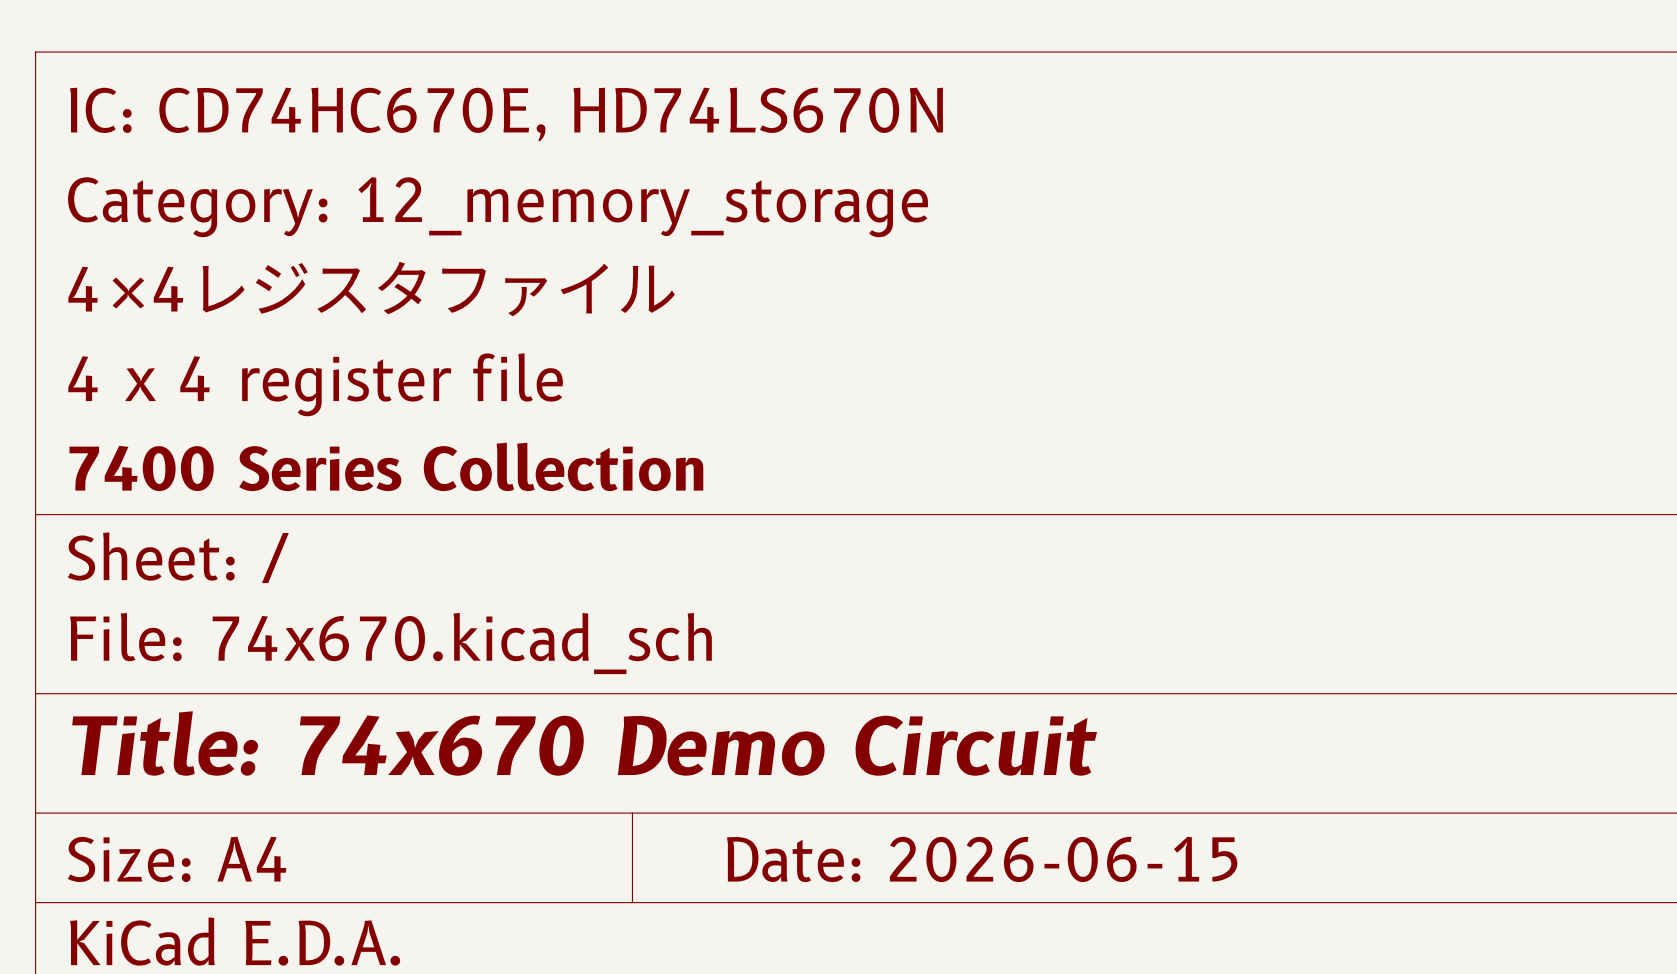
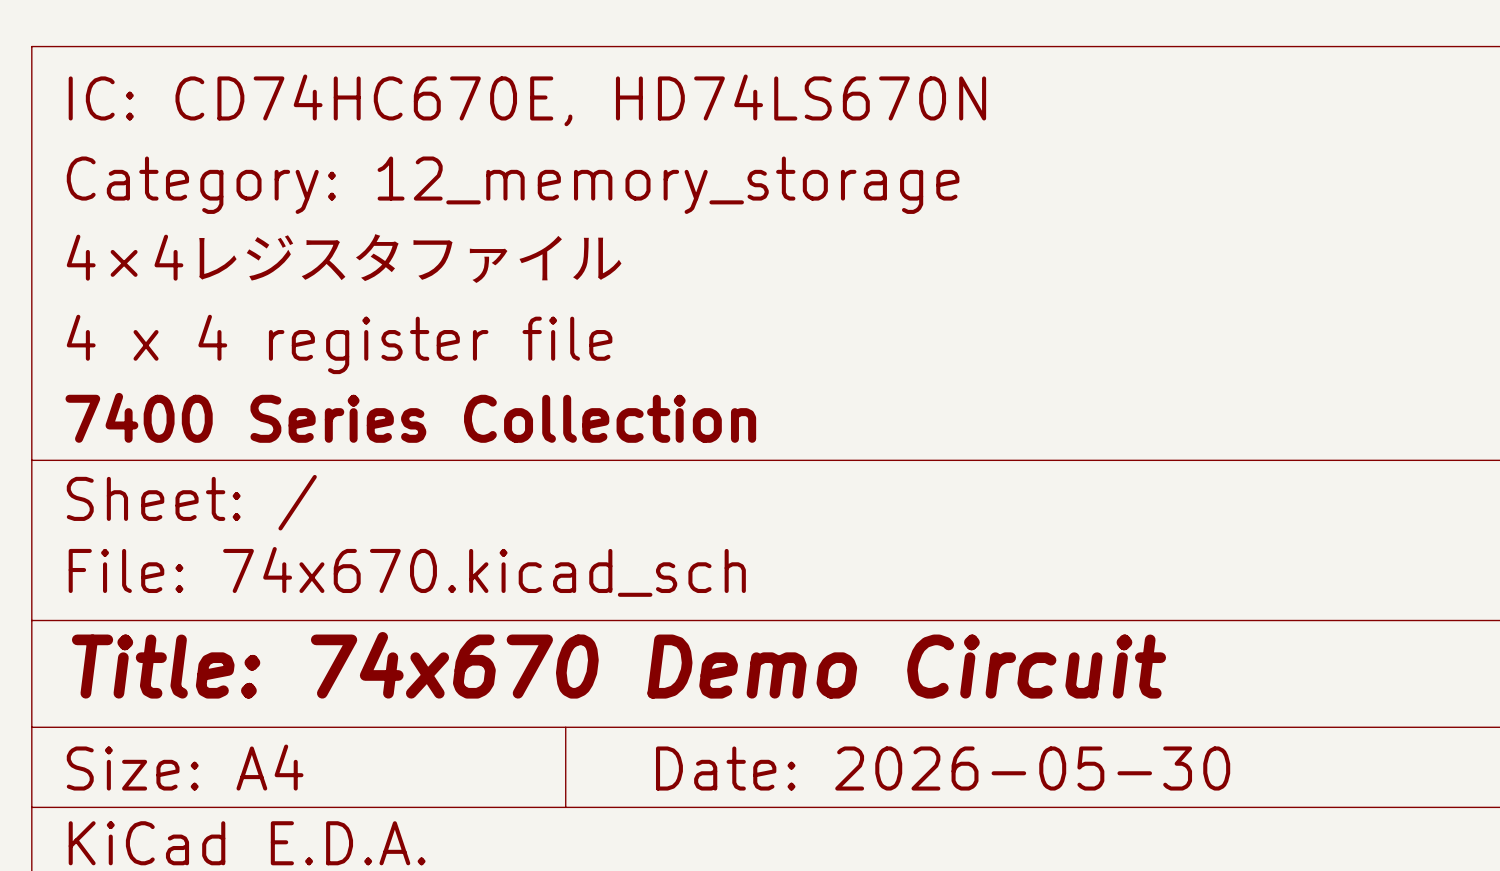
title block: Date: 2026-06-15 (982, 859) -> Date: 2026-05-30 (943, 768)

